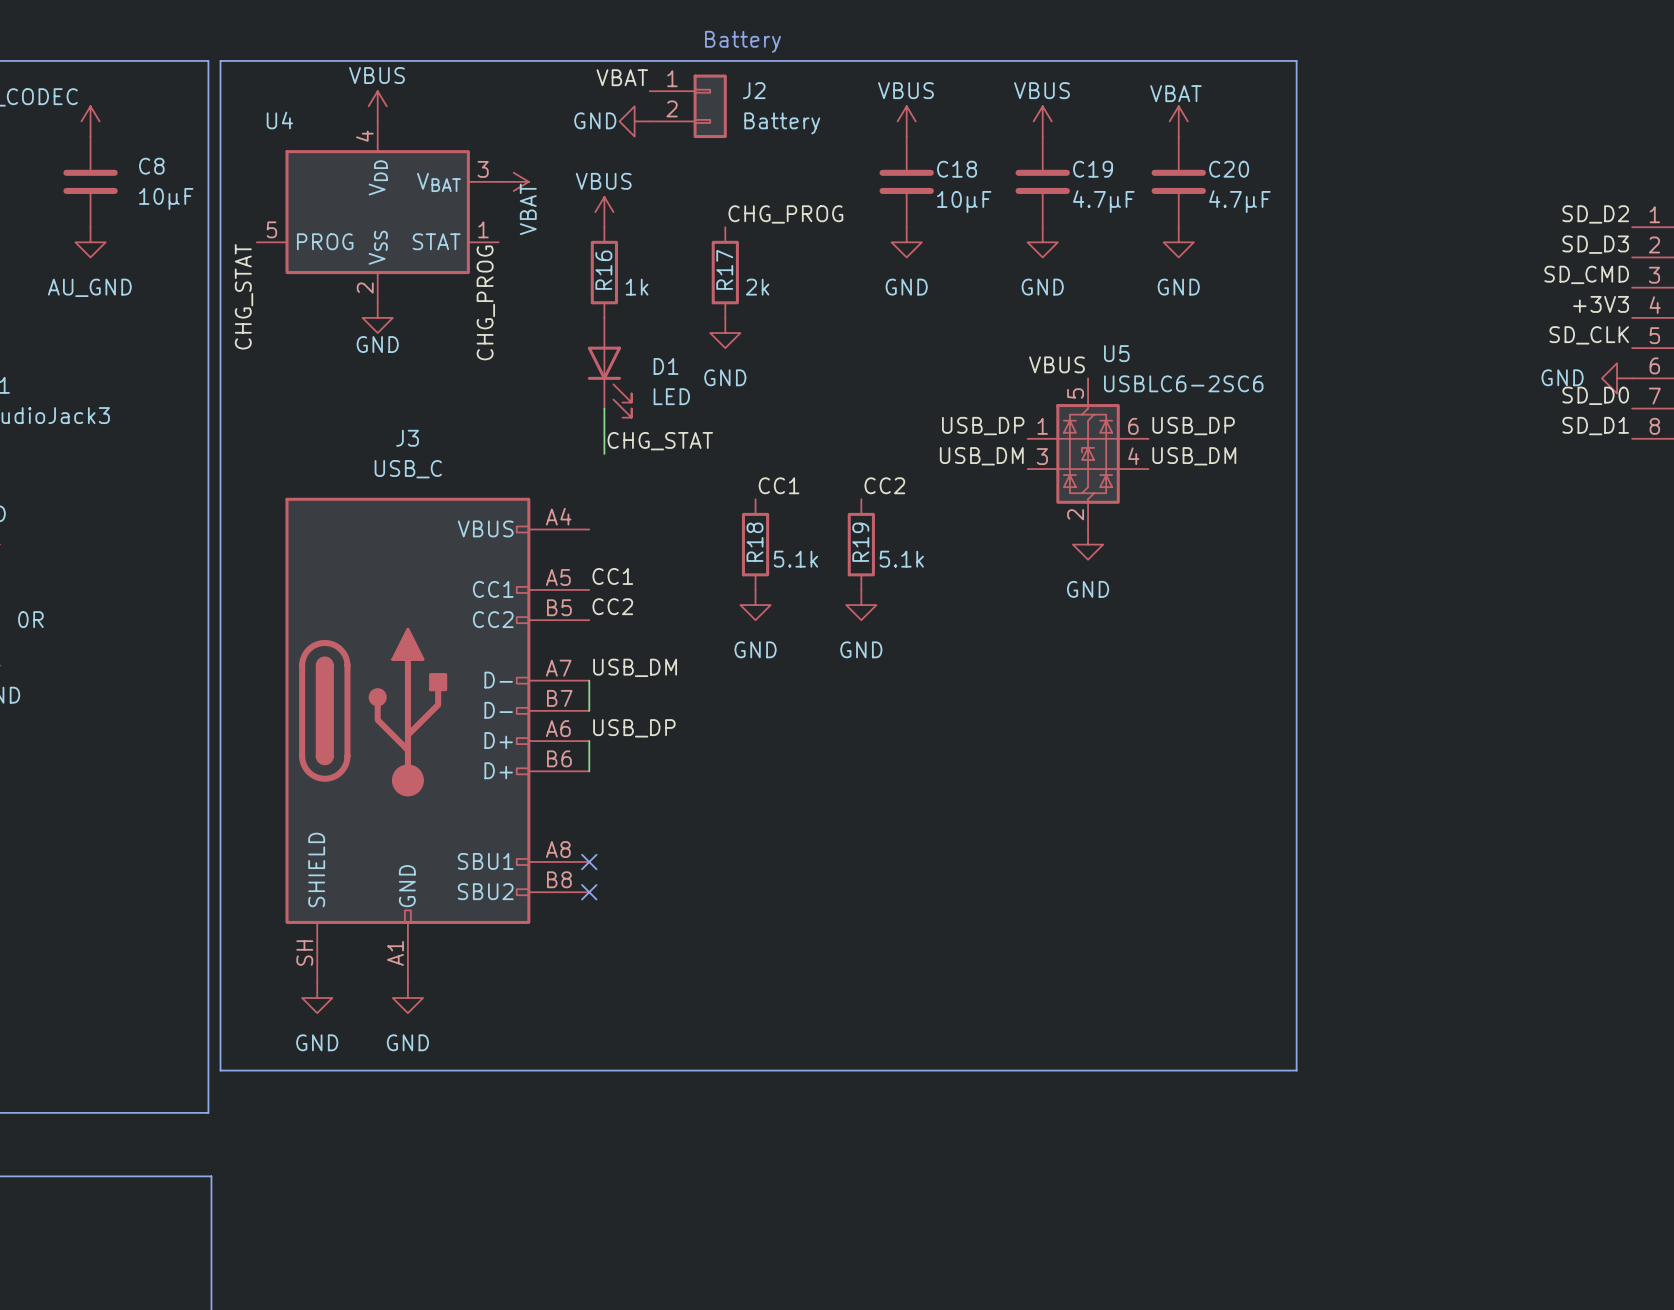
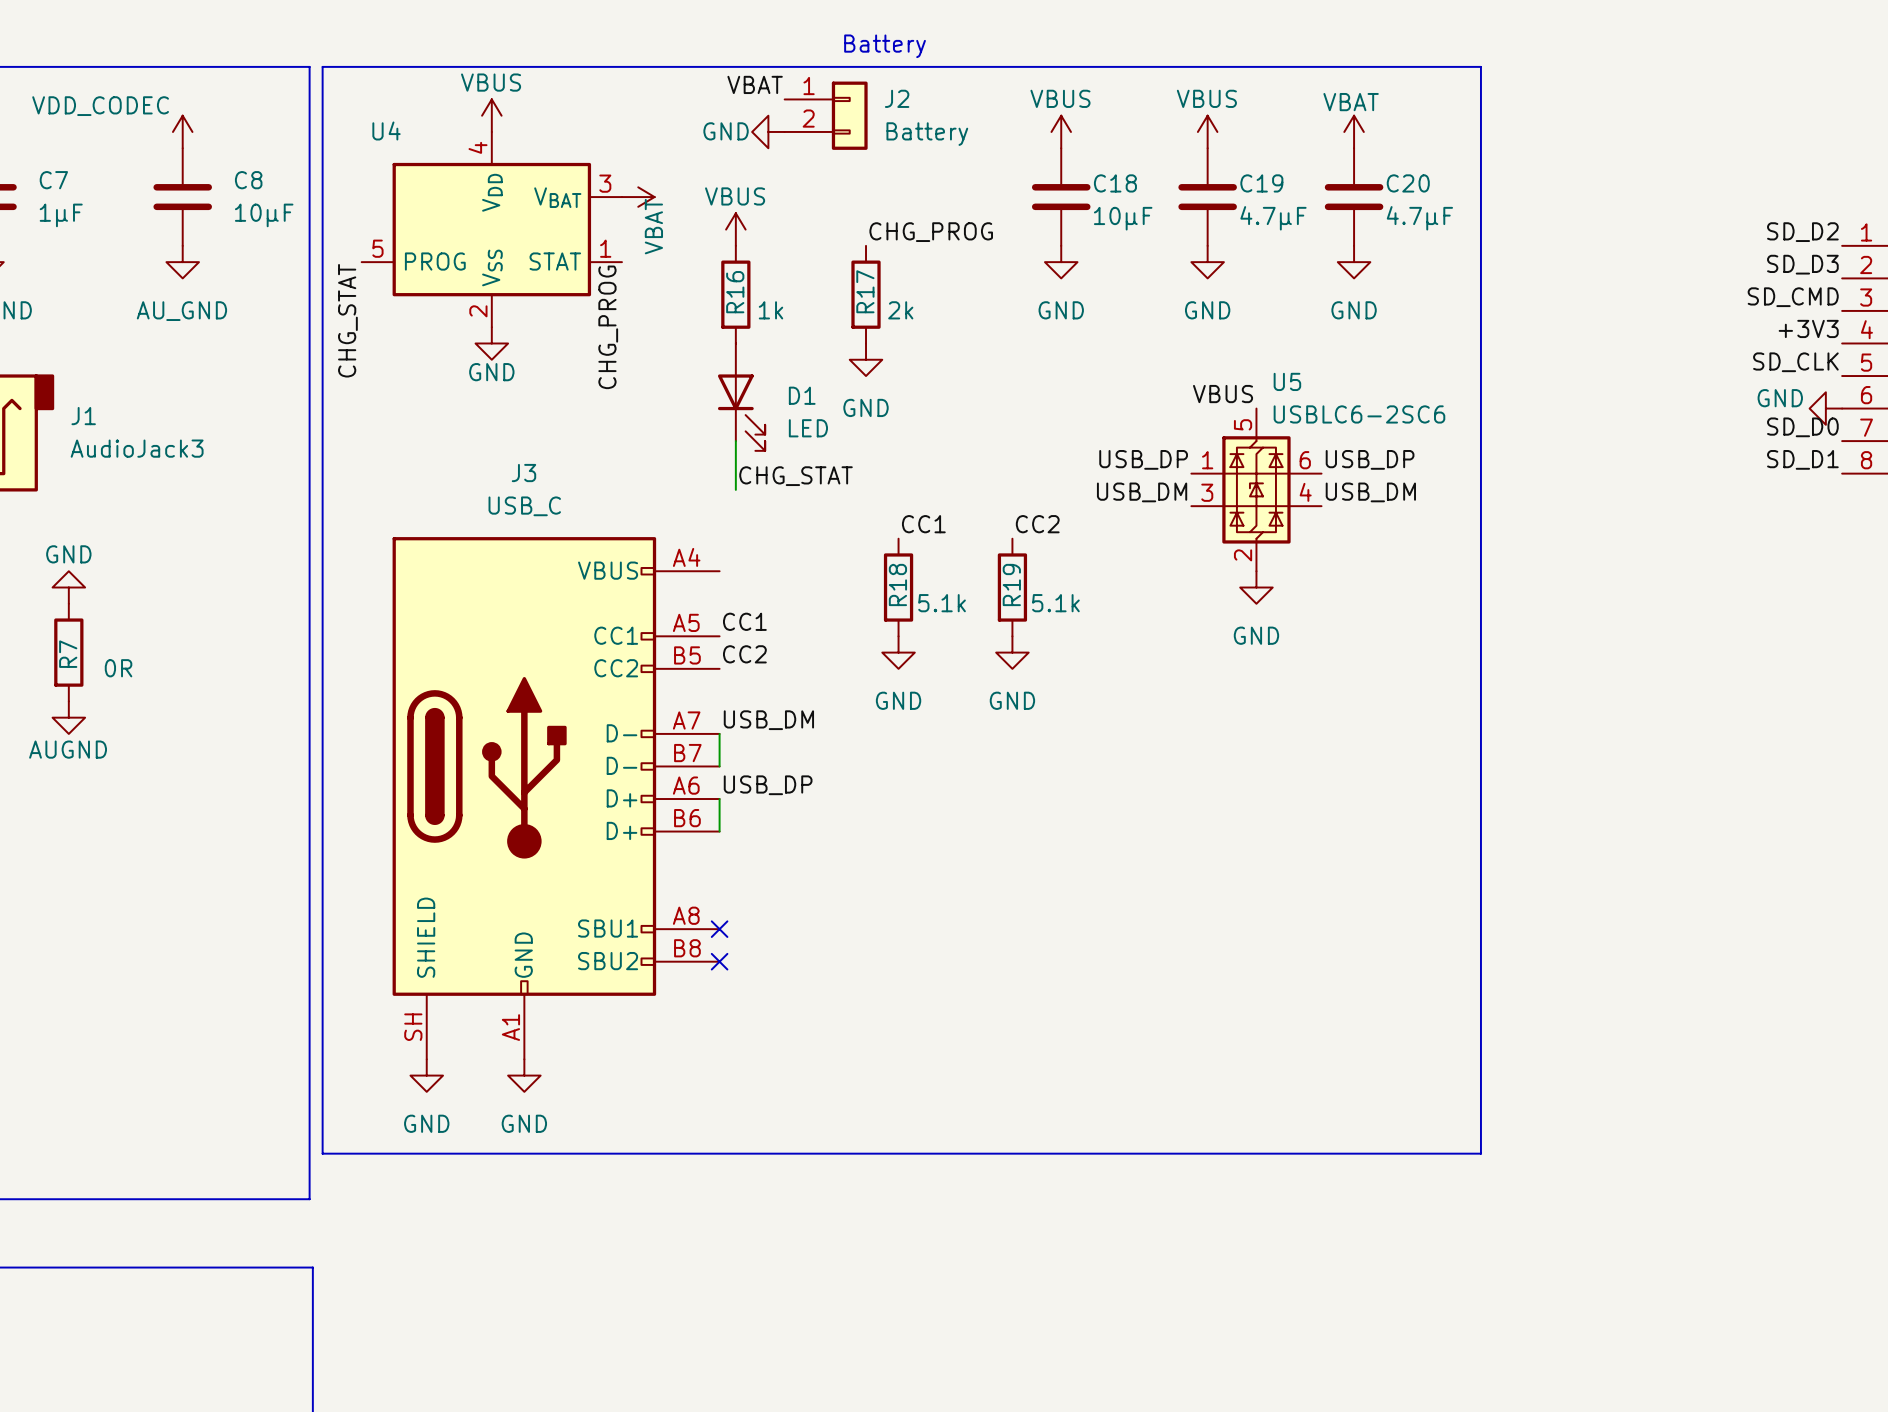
power symbol text position: GND (1562, 377) -> GND (1780, 398)

